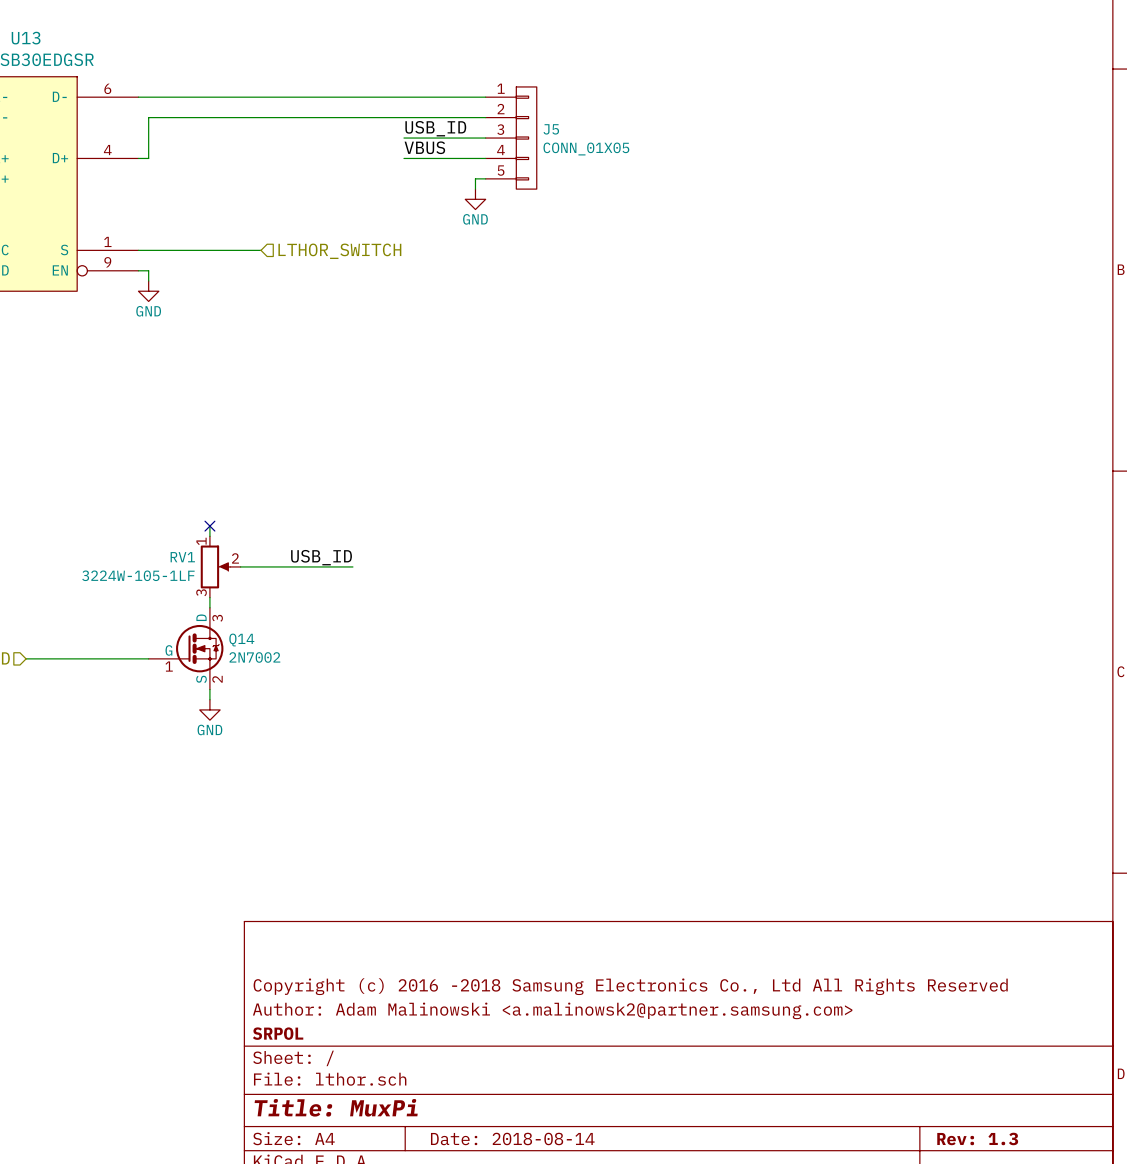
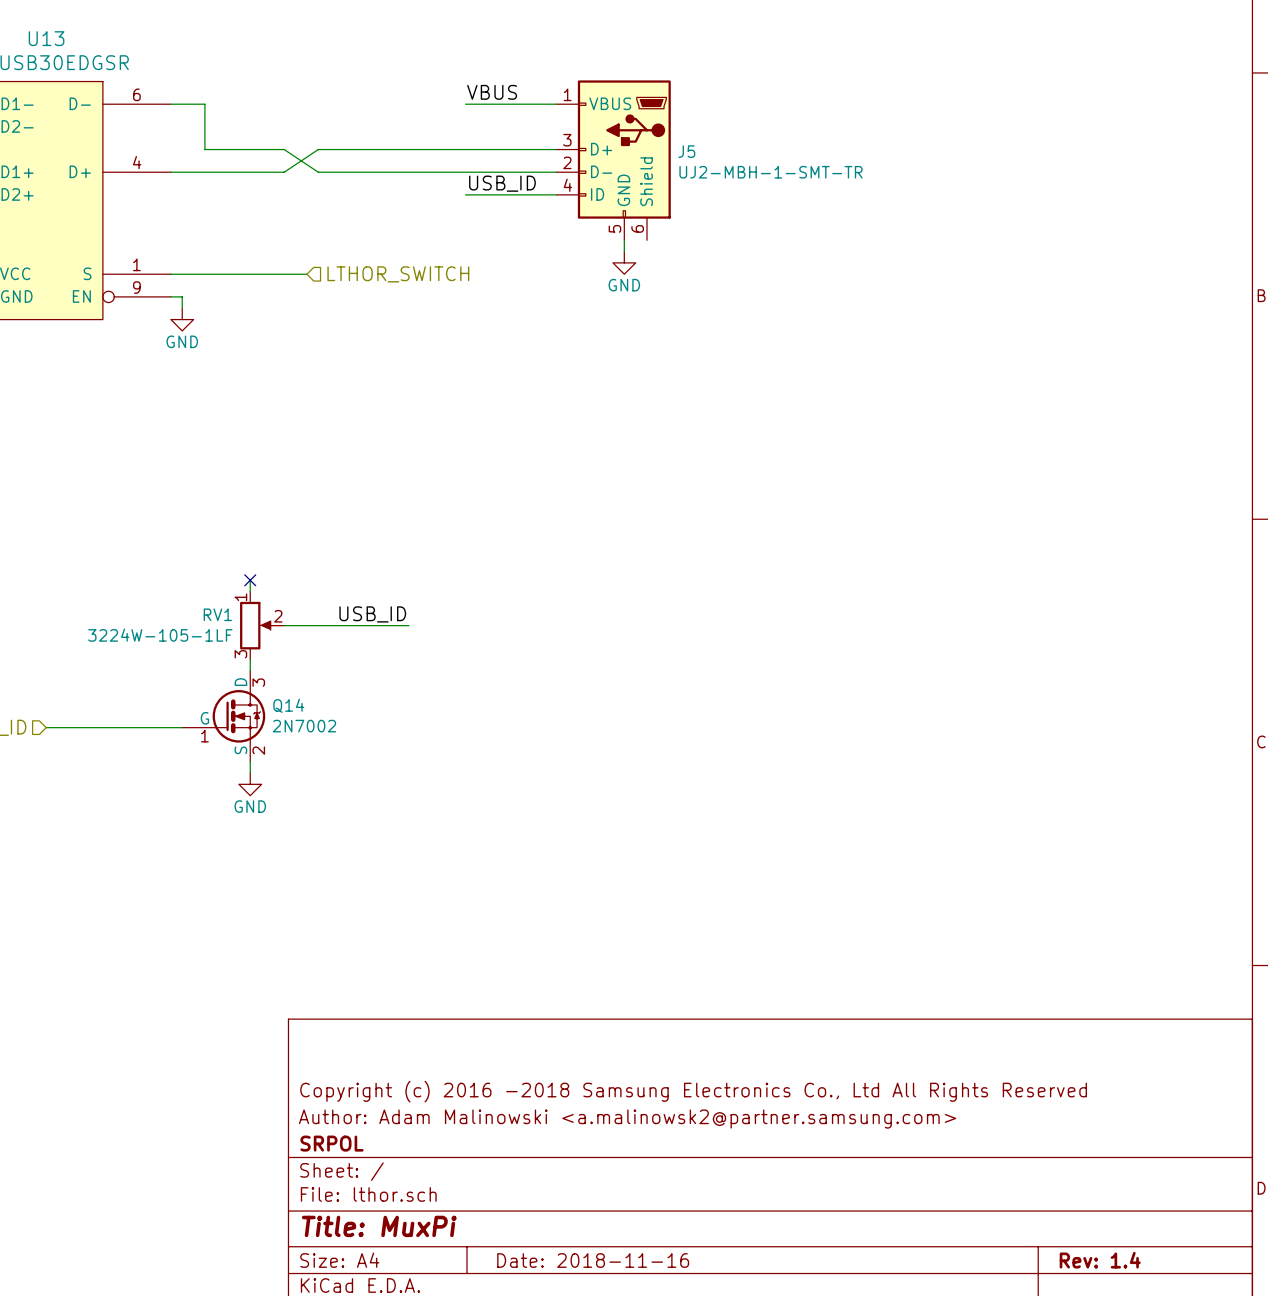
J5 symbol: [485, 86, 537, 190] -> [556, 80, 671, 241]
wire: (169, 97) (403, 97) -> (204, 104) (204, 149) (284, 149) (318, 172) (465, 172)
wire: (485, 117) (148, 117) (148, 158) -> (465, 149) (318, 149) (284, 172) (182, 172)
label position: USB_ID (435, 128) -> USB_ID (502, 183)
J5 name position: J5 (551, 129) -> J5 (686, 151)
label position: VBUS (424, 147) -> VBUS (492, 92)
J5 value: CONN_01X05 (586, 149) -> UJ2-MBH-1-SMT-TR (771, 172)
wire: (475, 178) (475, 189) -> (544, 194) (465, 194)
power symbol position: GND (475, 199) -> GND (624, 262)
wire: none -> (624, 240) (624, 251)
title block: Date: 2018-08-14 (512, 1138) -> Date: 2018-11-16 (593, 1260)
title block: Rev: 1.3 (977, 1138) -> Rev: 1.4 (1100, 1260)

